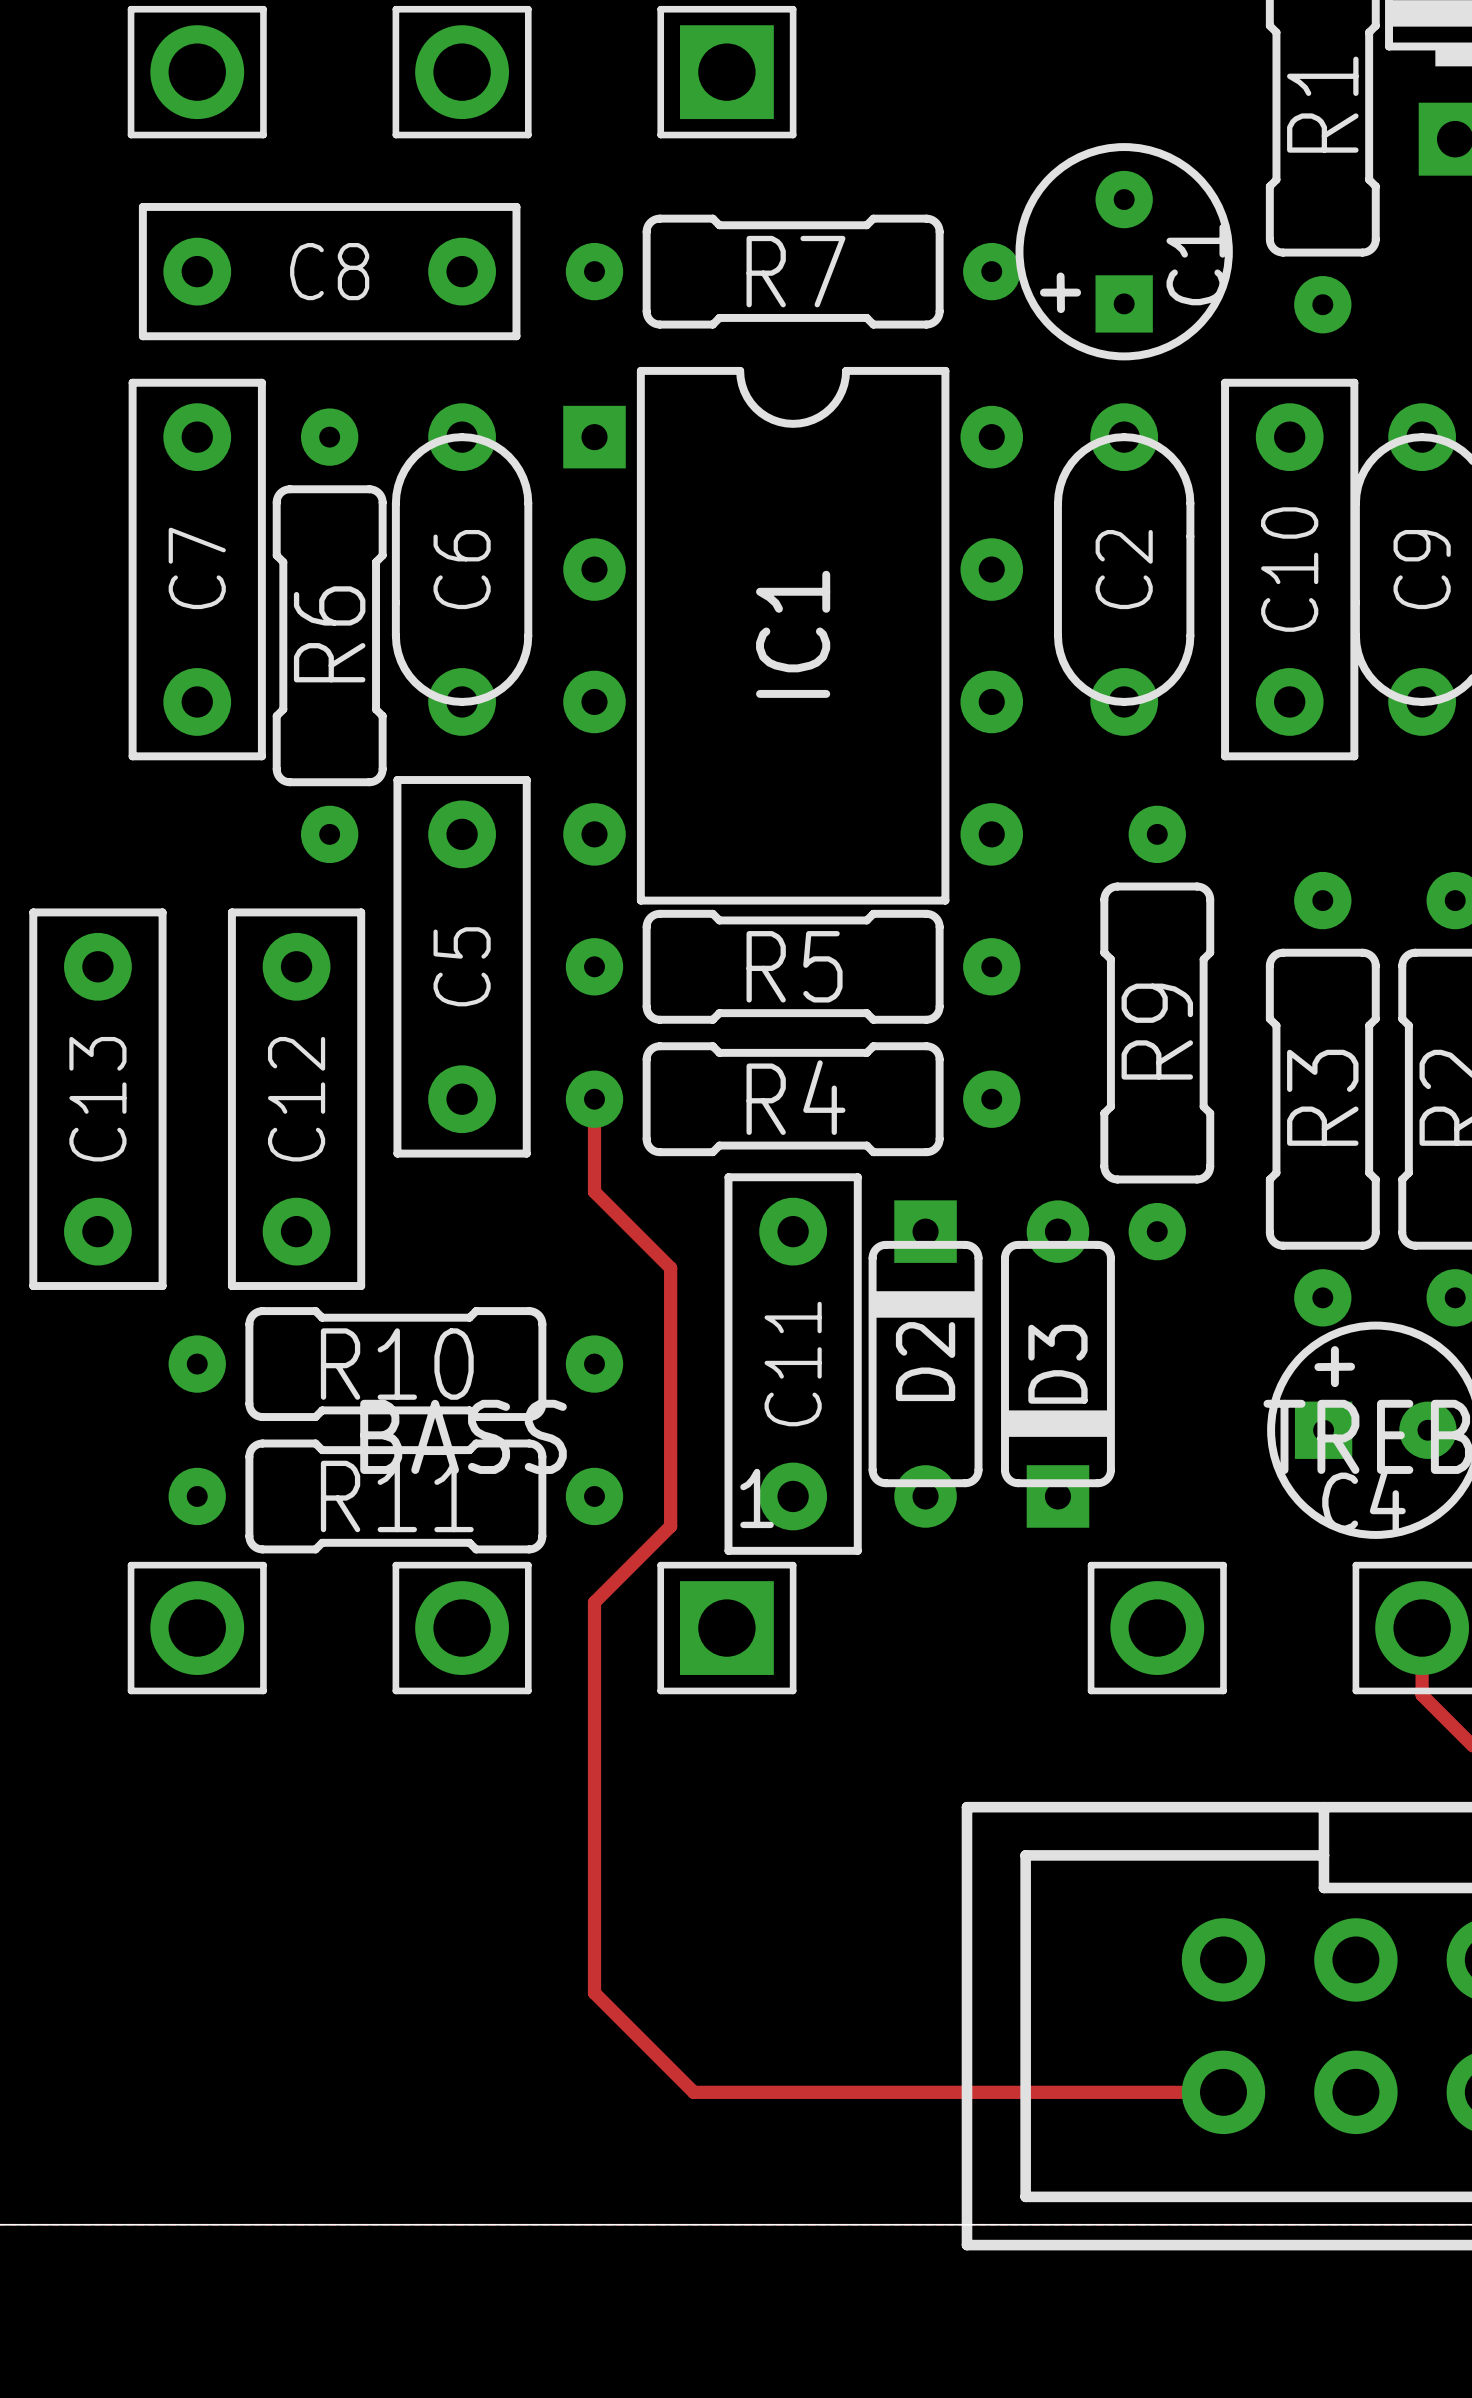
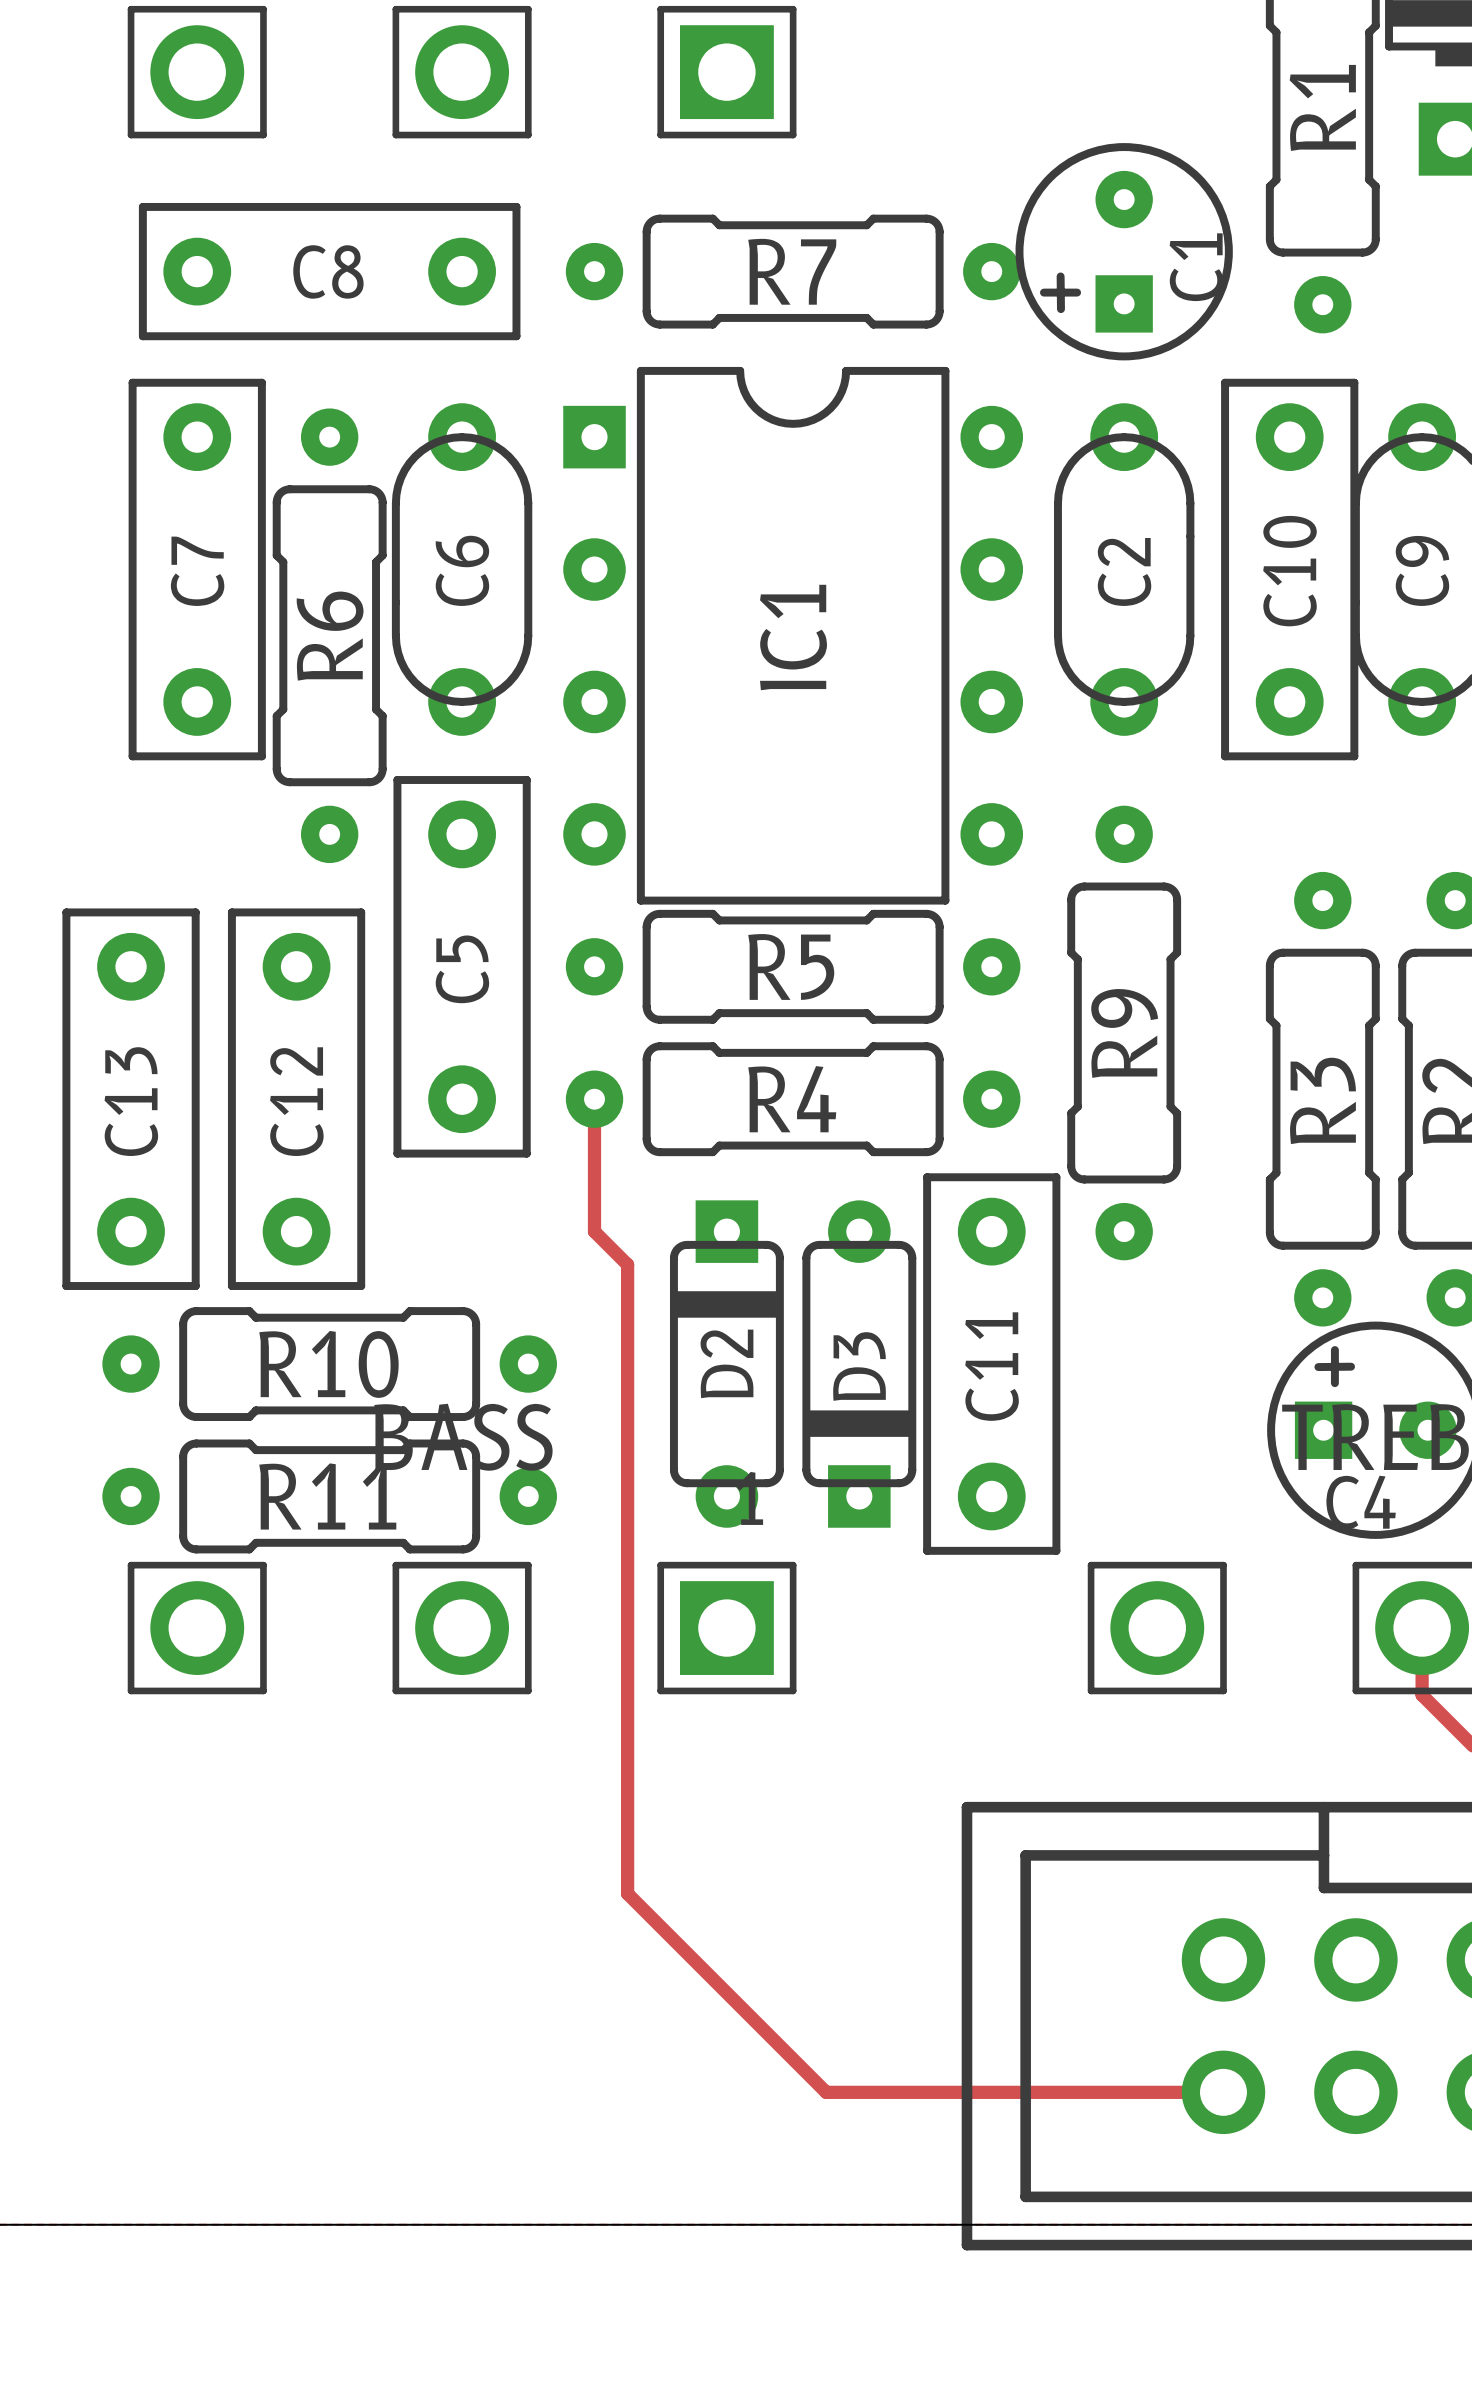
R9 position: (1157, 1033) -> (1124, 1033)
C13 position: (97, 1099) -> (131, 1099)
track: (594, 1191) (670, 1268) (670, 1526) (594, 1602) (594, 1993) (693, 2092) (826, 2092) -> (594, 1191) (594, 1231) (627, 1264) (627, 1893) (826, 2092)
R10 position: (395, 1364) -> (329, 1364)
C11 position: (793, 1364) -> (991, 1364)
D2 position: (925, 1364) -> (726, 1364)
D3 position: (1057, 1364) -> (859, 1364)
R11 position: (395, 1496) -> (329, 1496)

